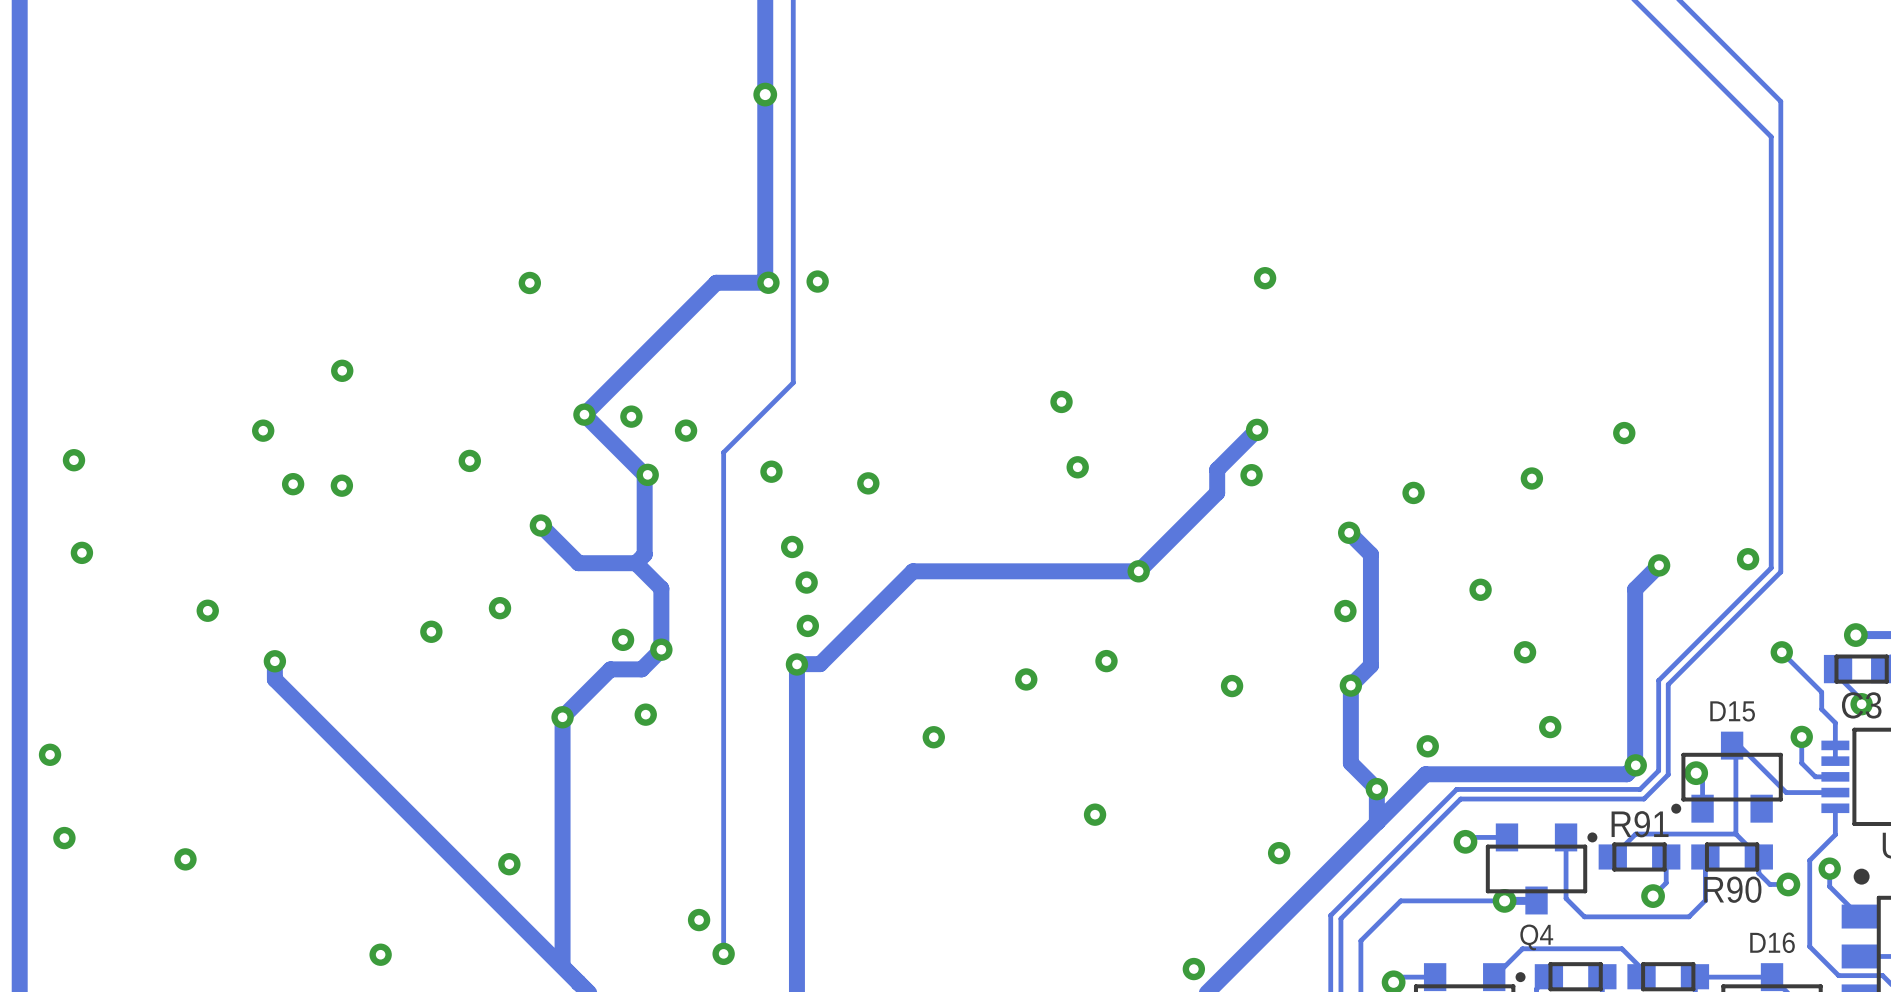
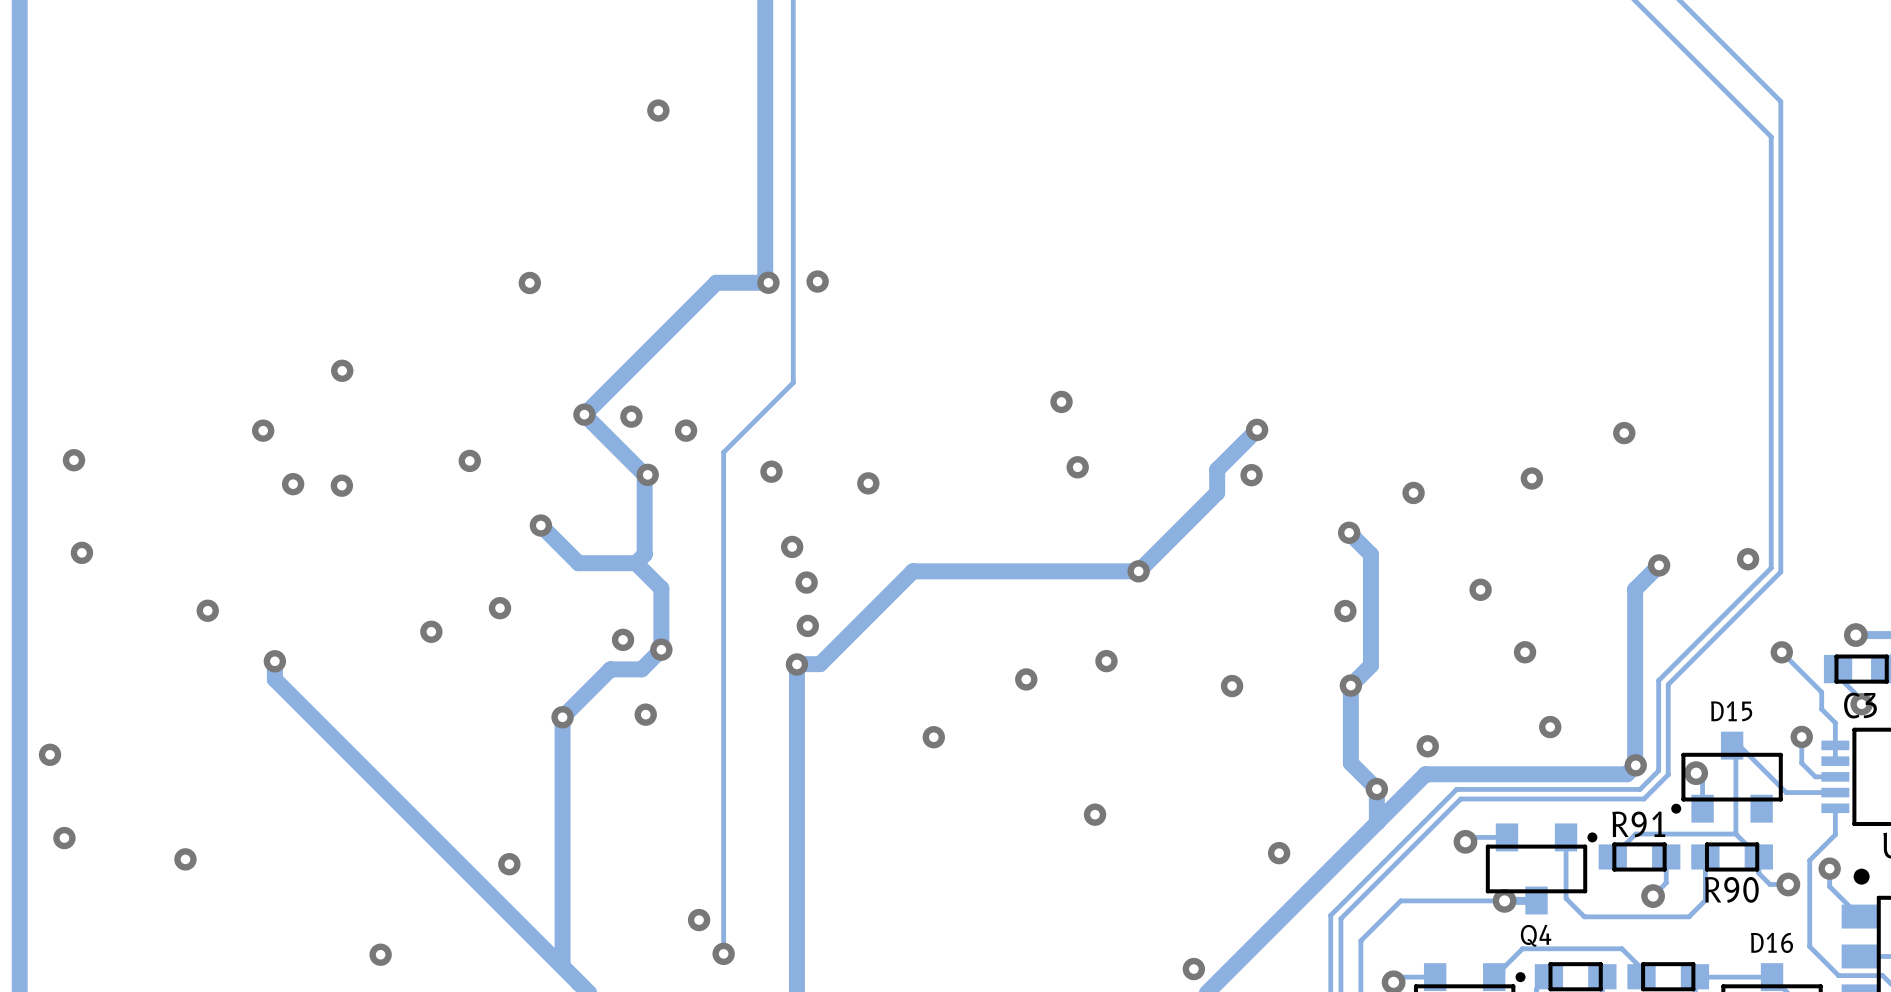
via: (765, 94) -> none
via: none -> (658, 110)
via: (1265, 278) -> none

